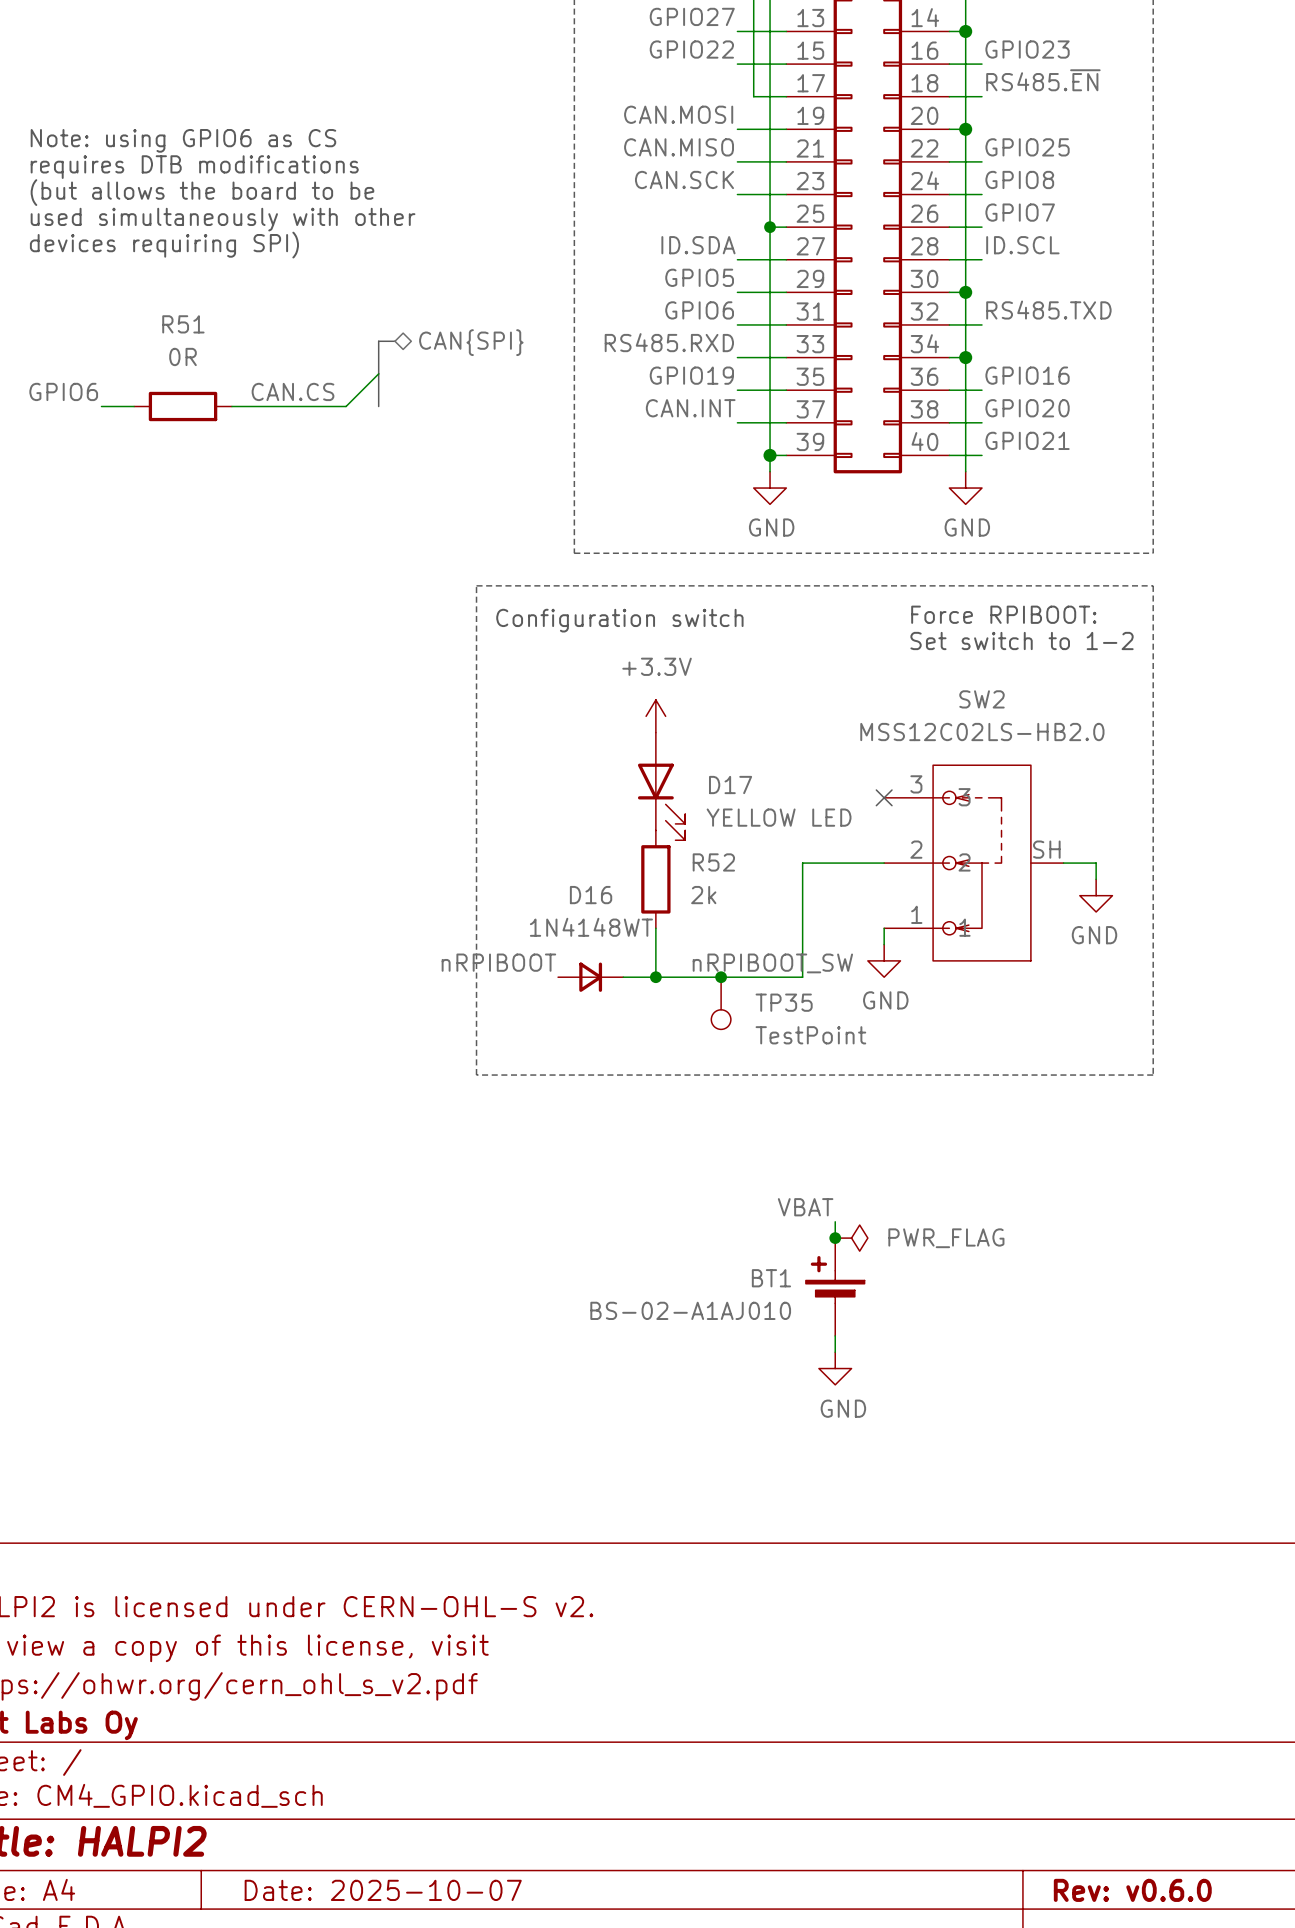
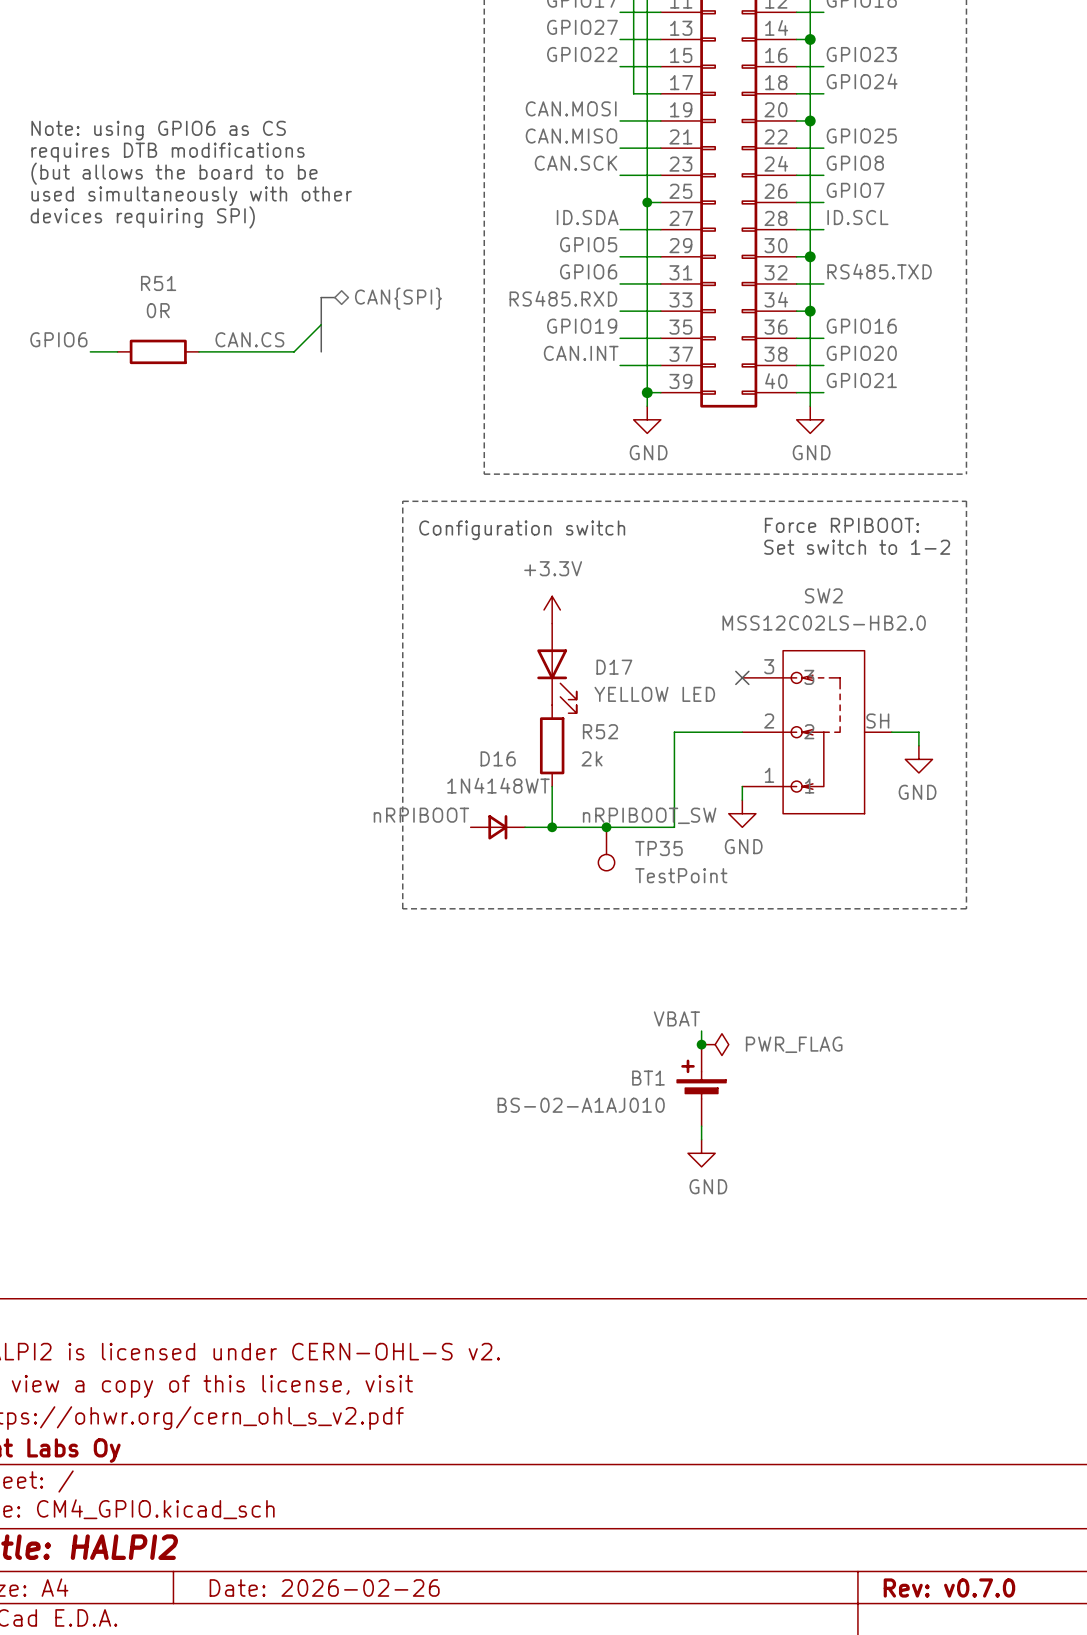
label: RS485.~{EN} (1043, 80) -> GPIO24 (862, 81)
title block: Date: 2025-10-07 (383, 1890) -> Date: 2026-02-26 (324, 1587)
title block: Rev: v0.6.0 (1132, 1890) -> Rev: v0.7.0 (949, 1587)

